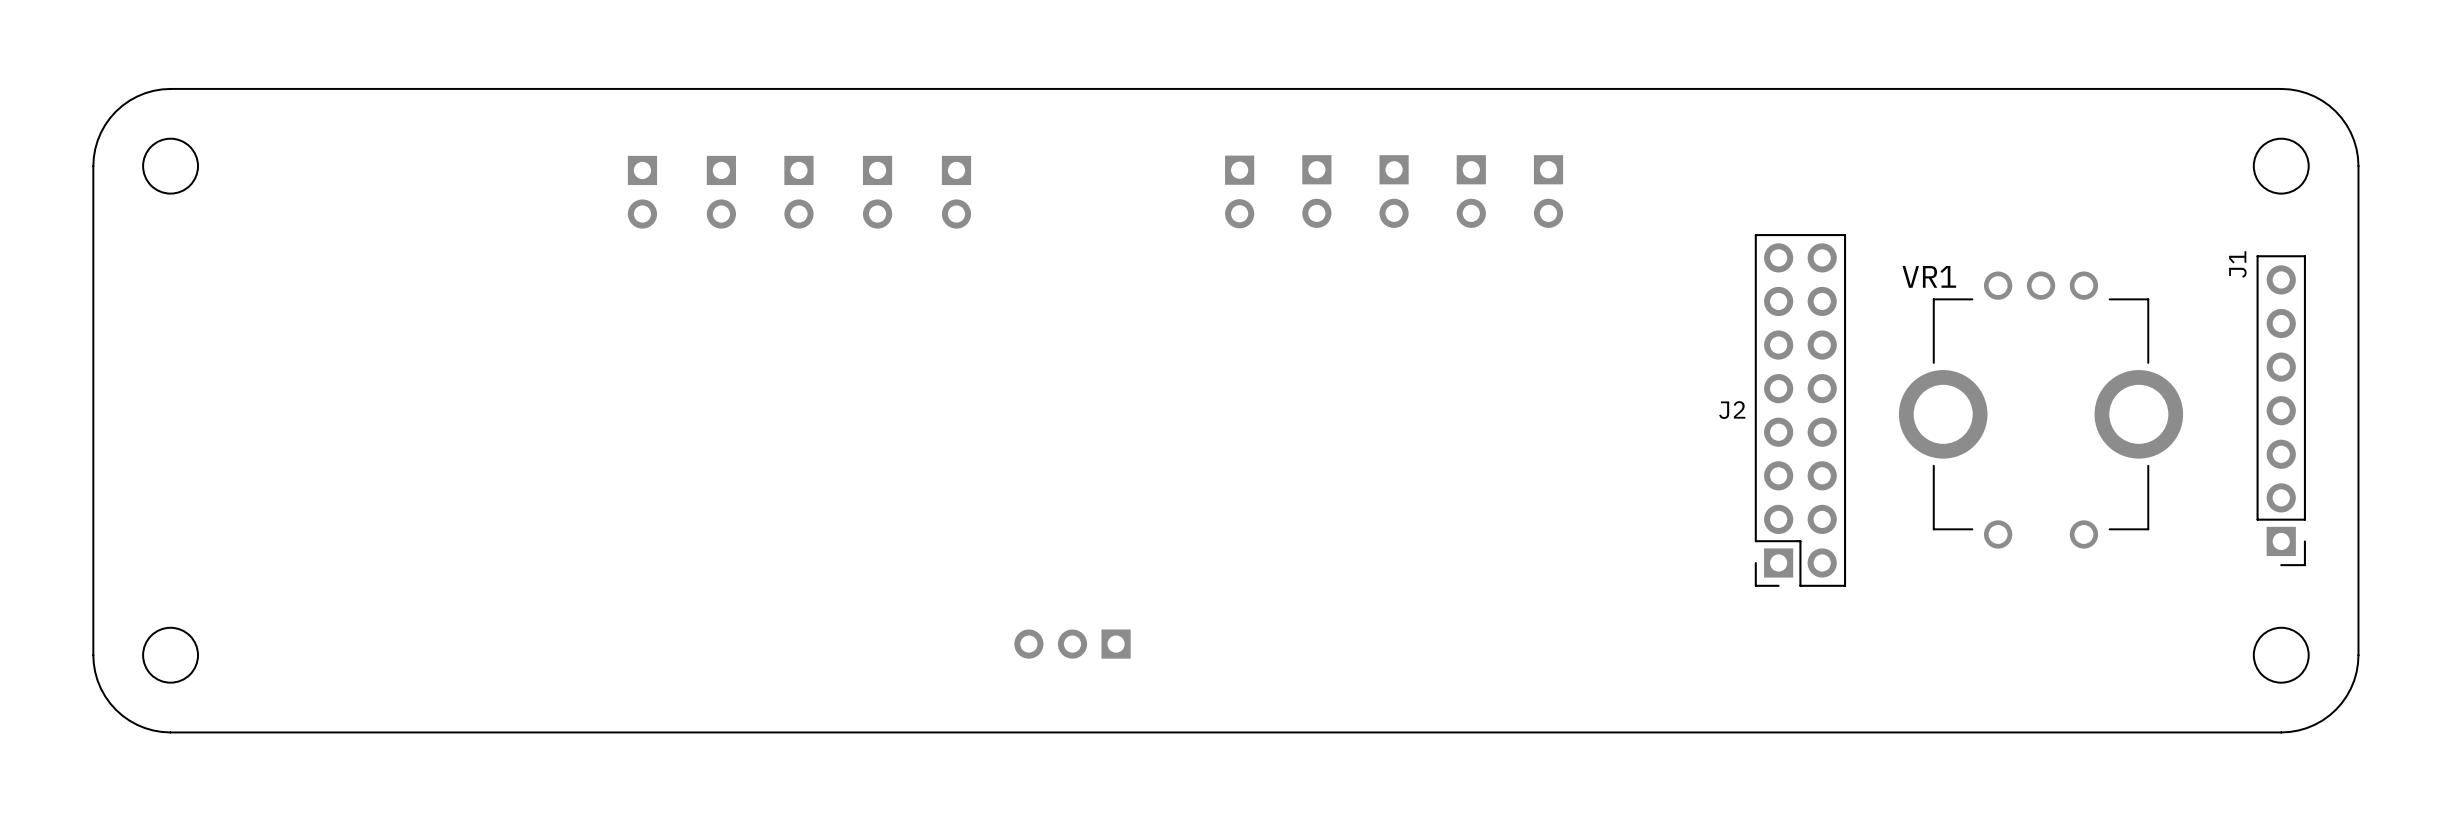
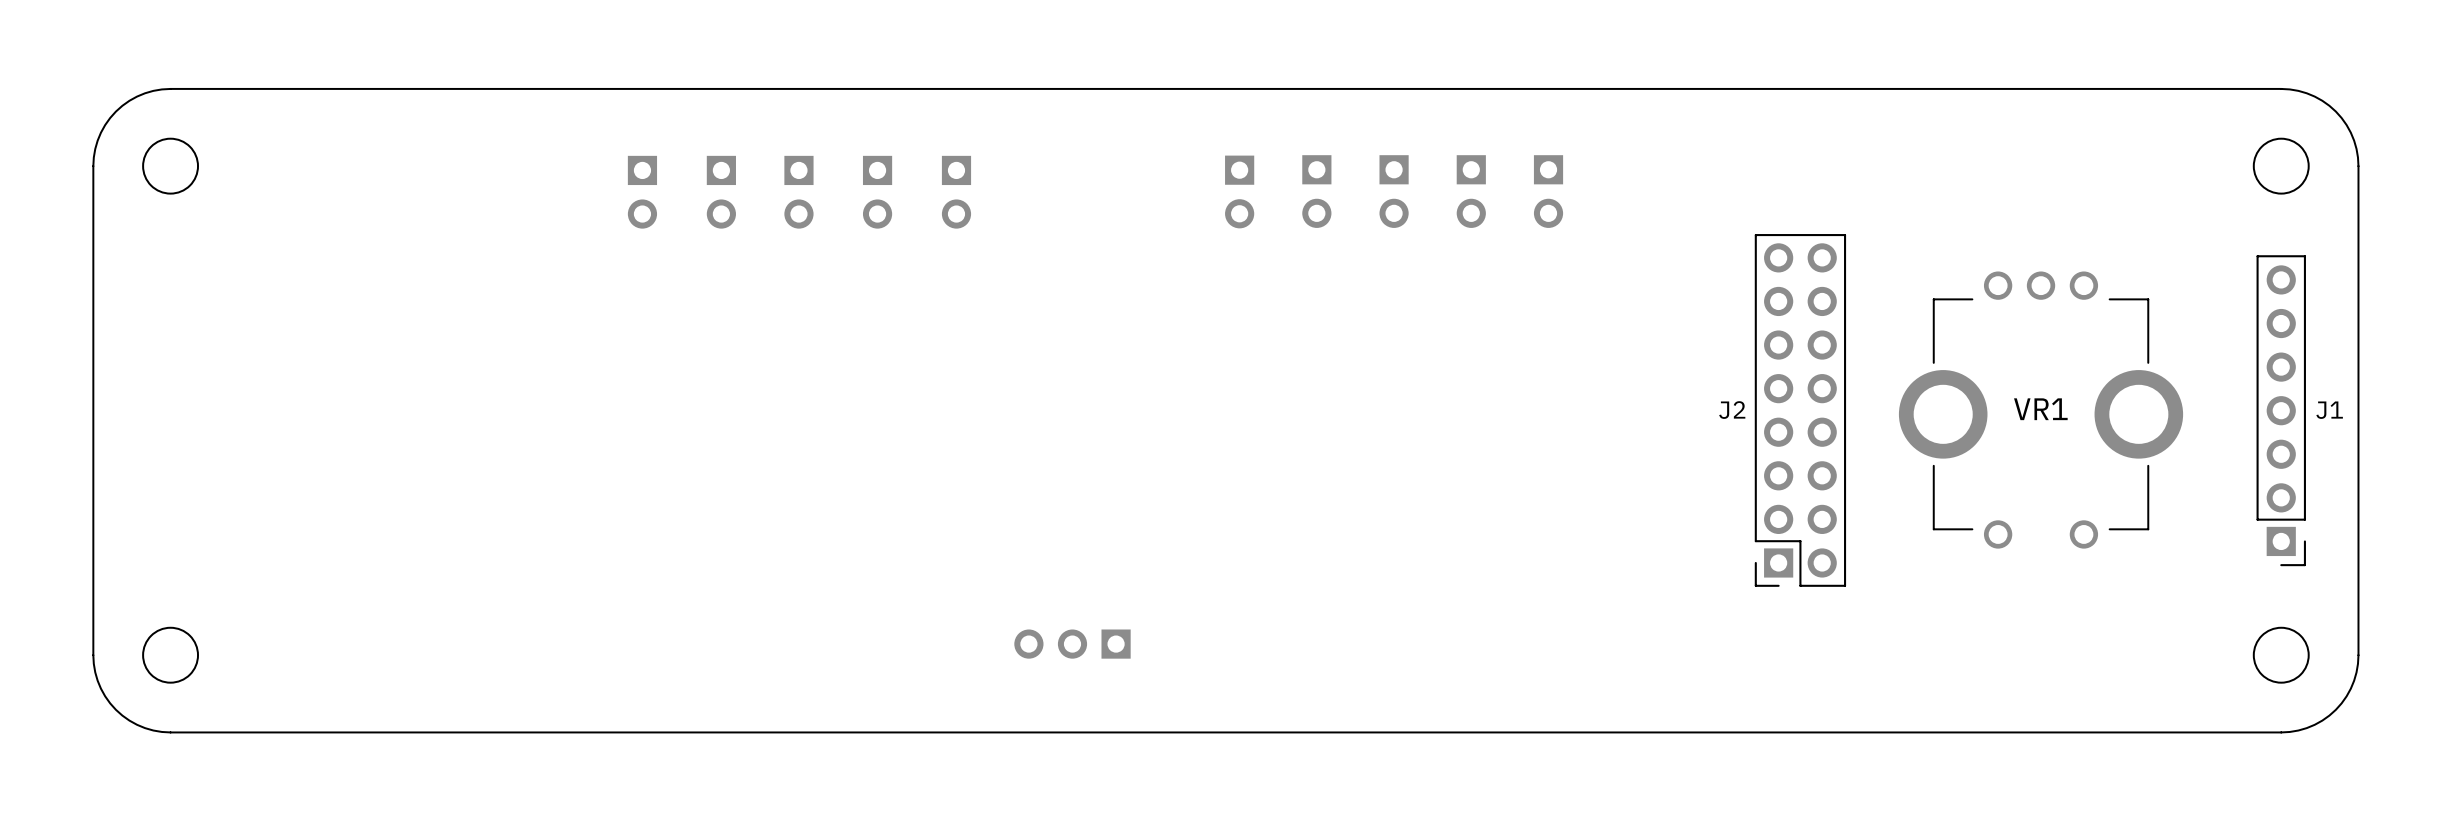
J1 name rotation: 0° (2237, 264) -> 90° clockwise (2329, 410)
J1 name position: J1 (2237, 264) -> J1 (2329, 410)
VR1 name position: VR1 (1929, 276) -> VR1 (2040, 409)

